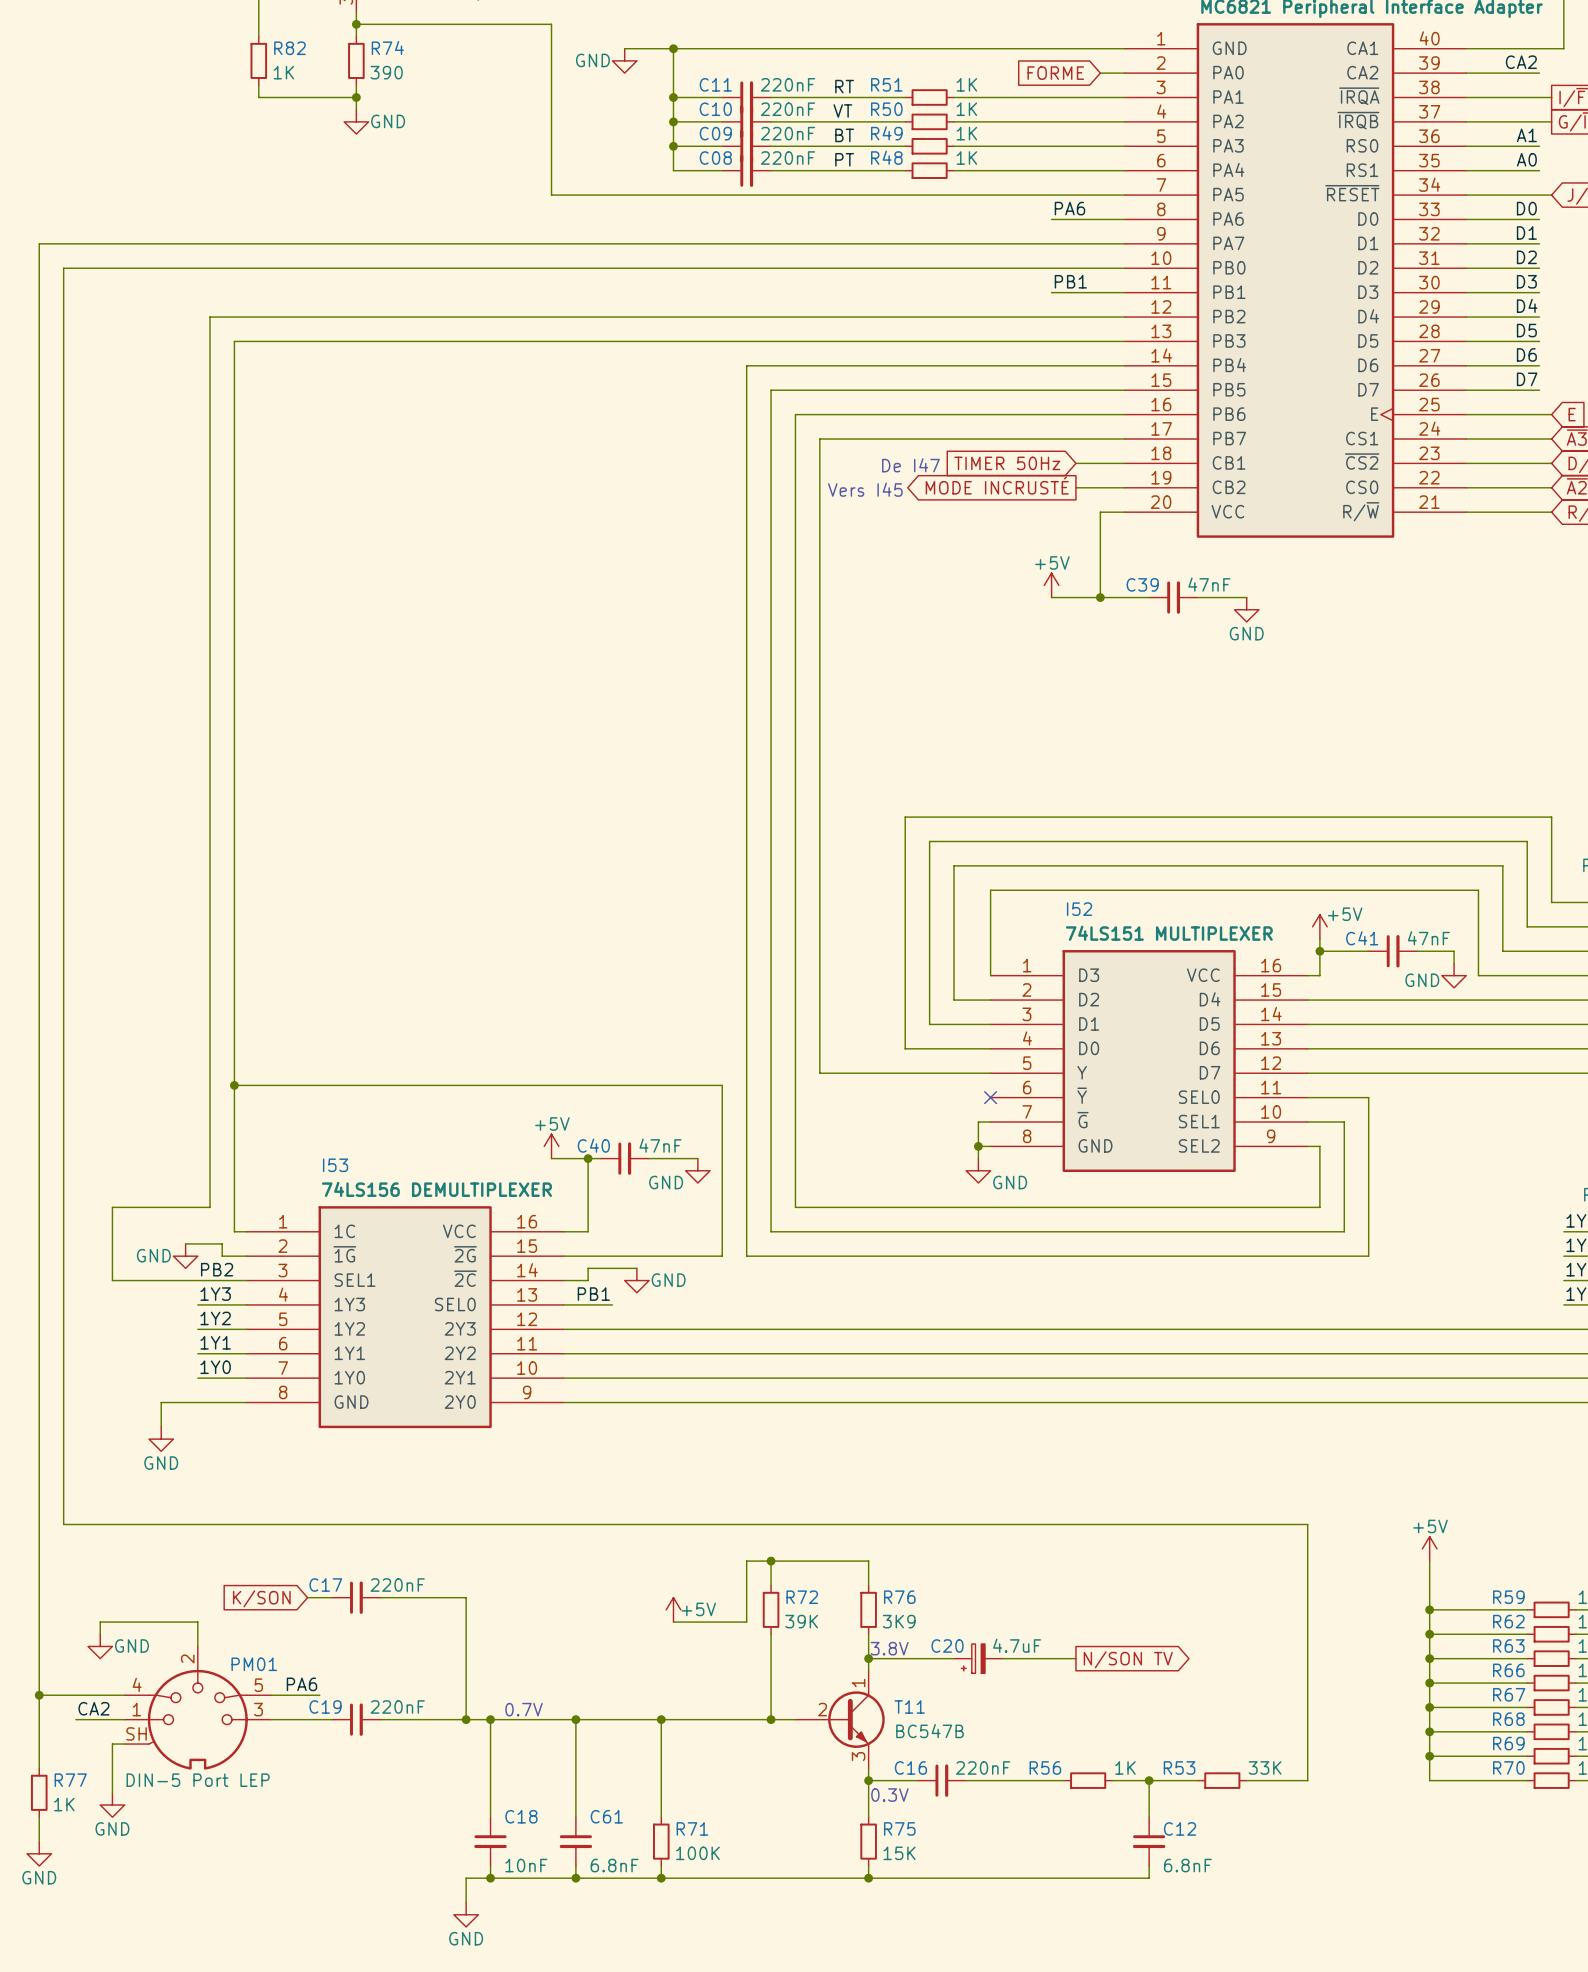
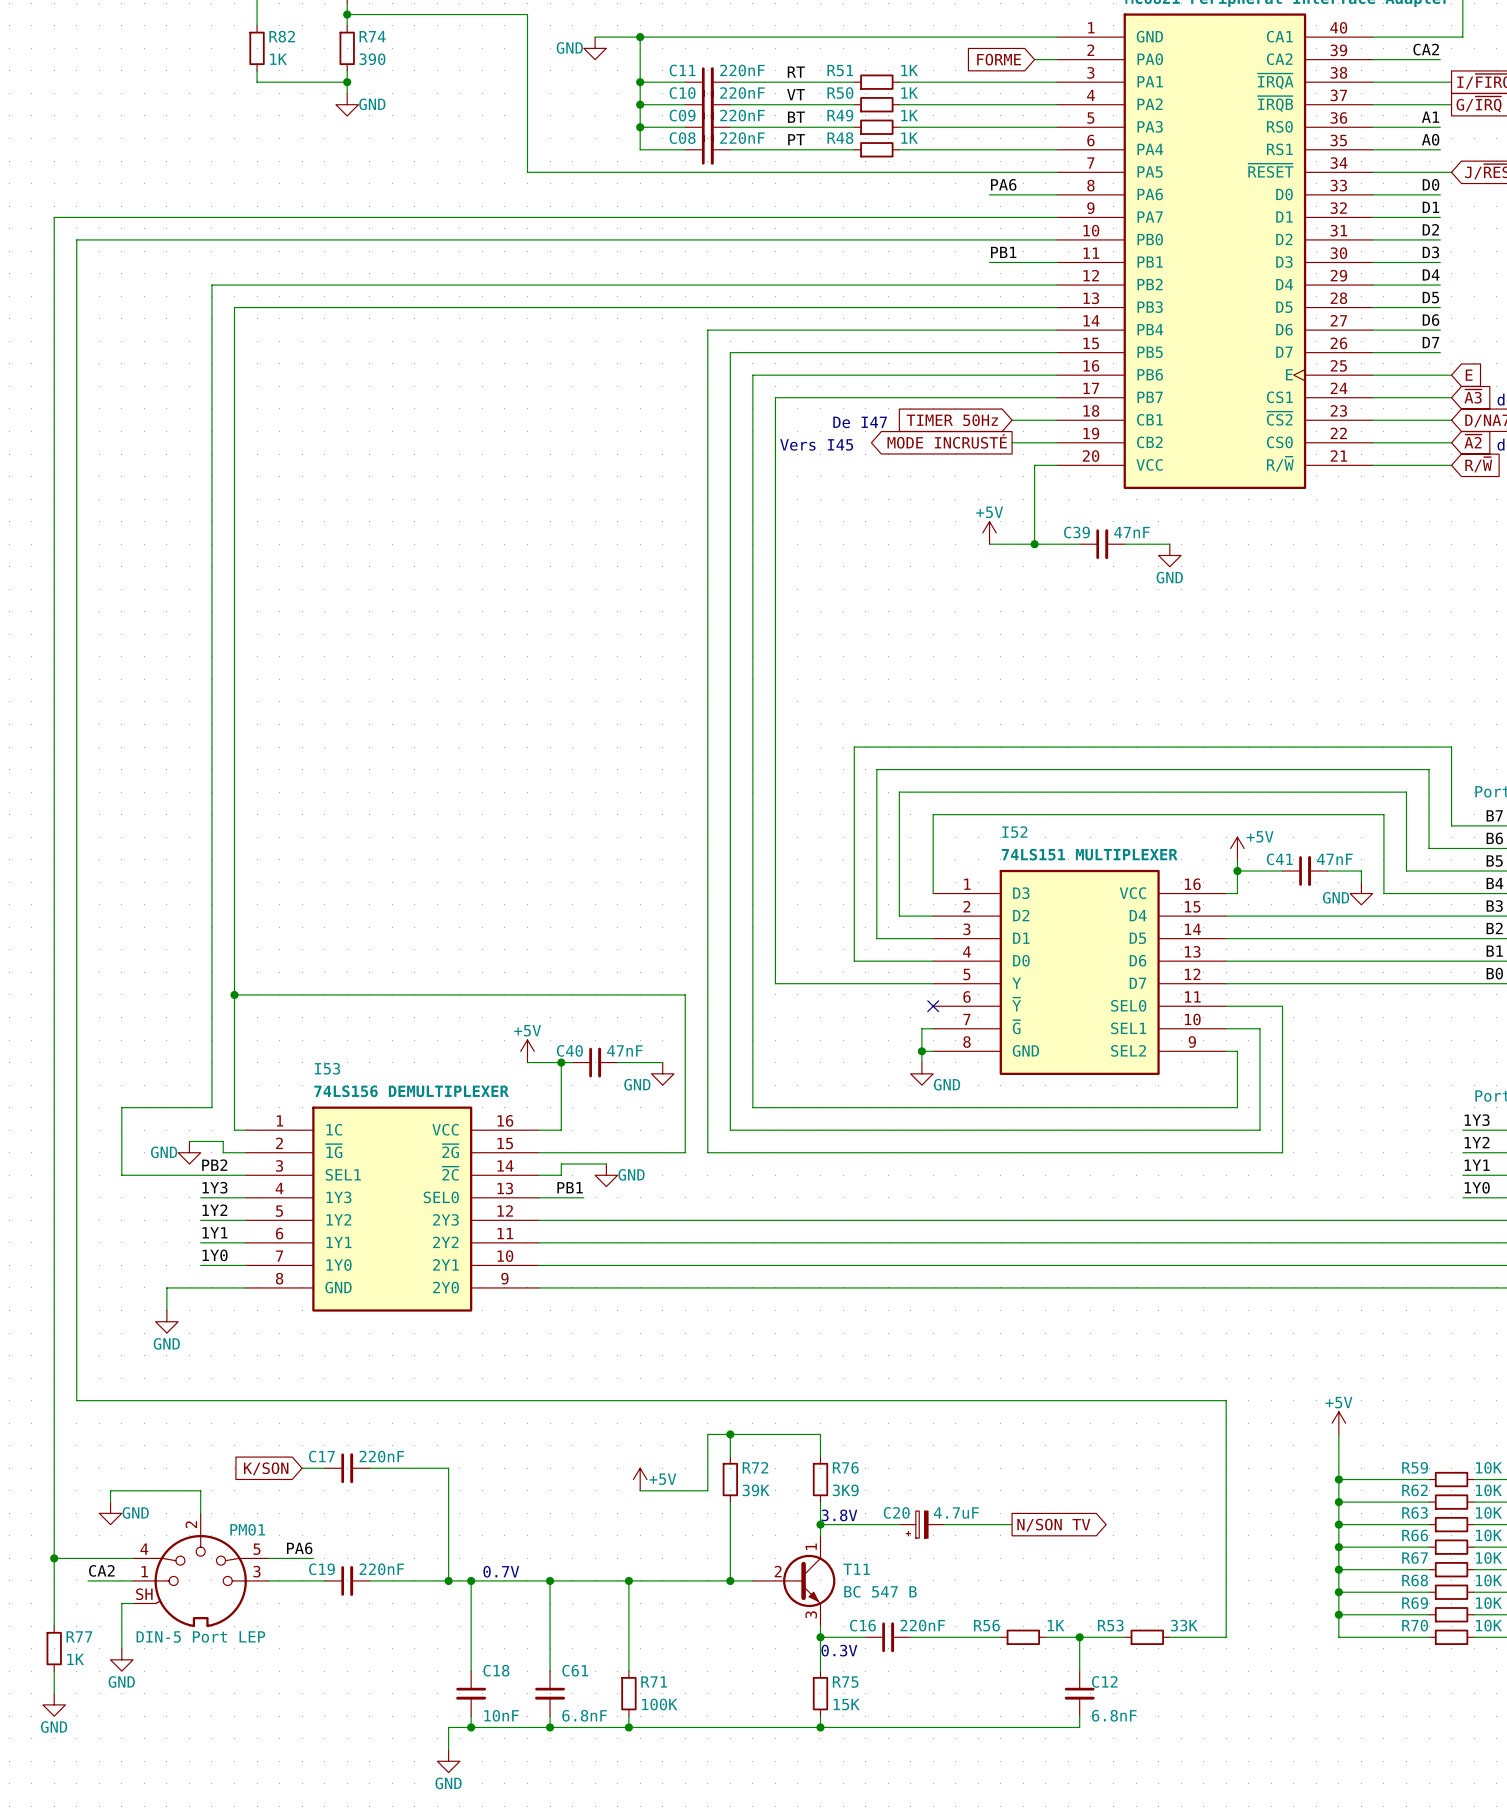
T11 value: BC547B (929, 1731) -> BC 547 B (880, 1591)

